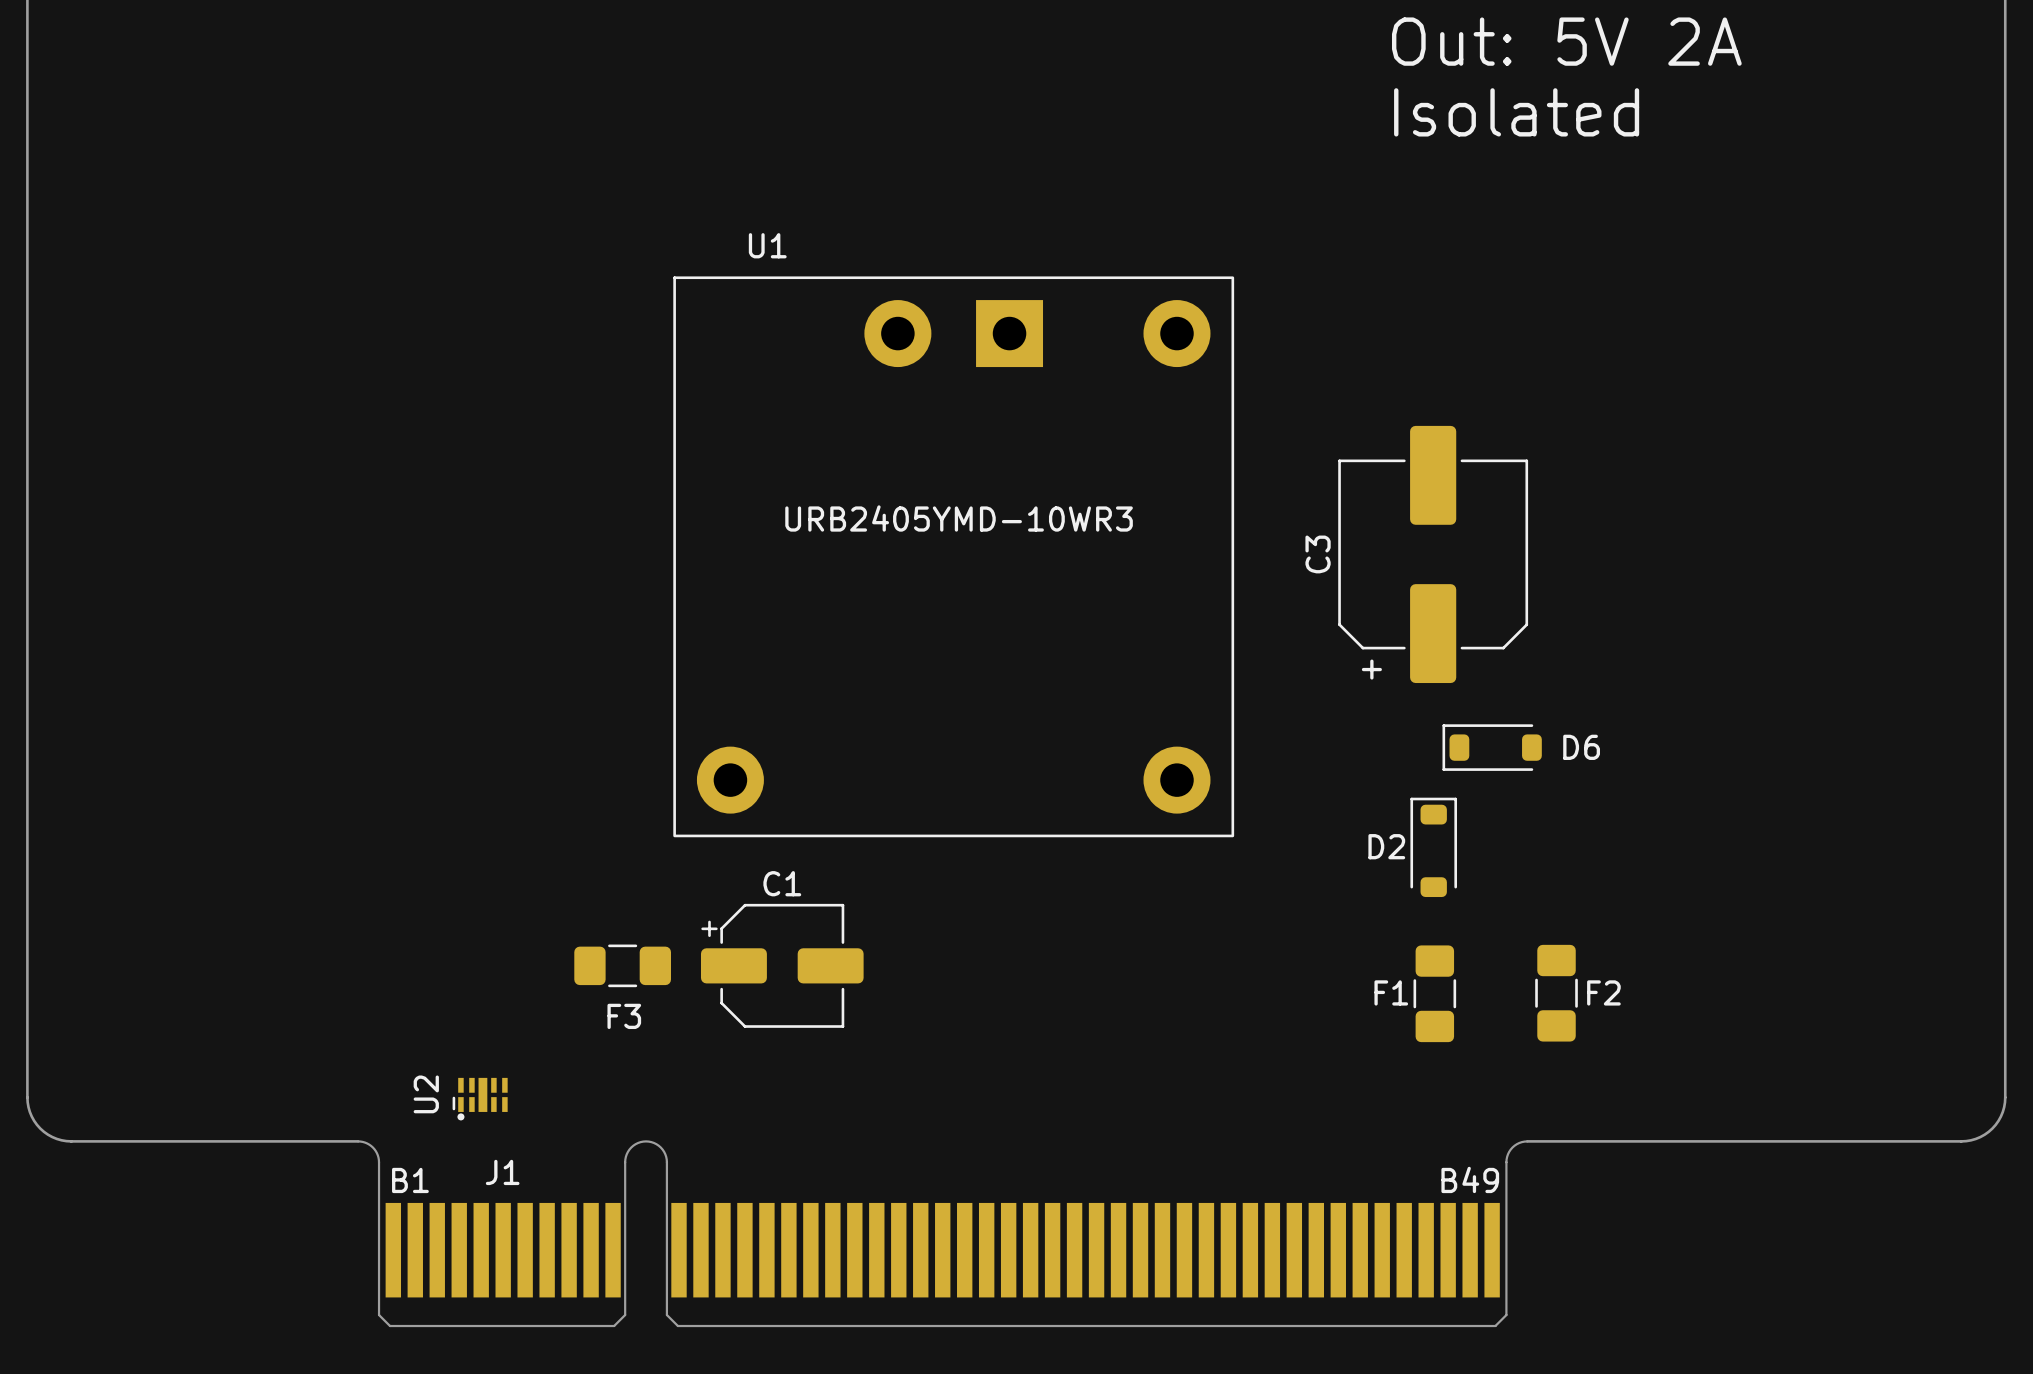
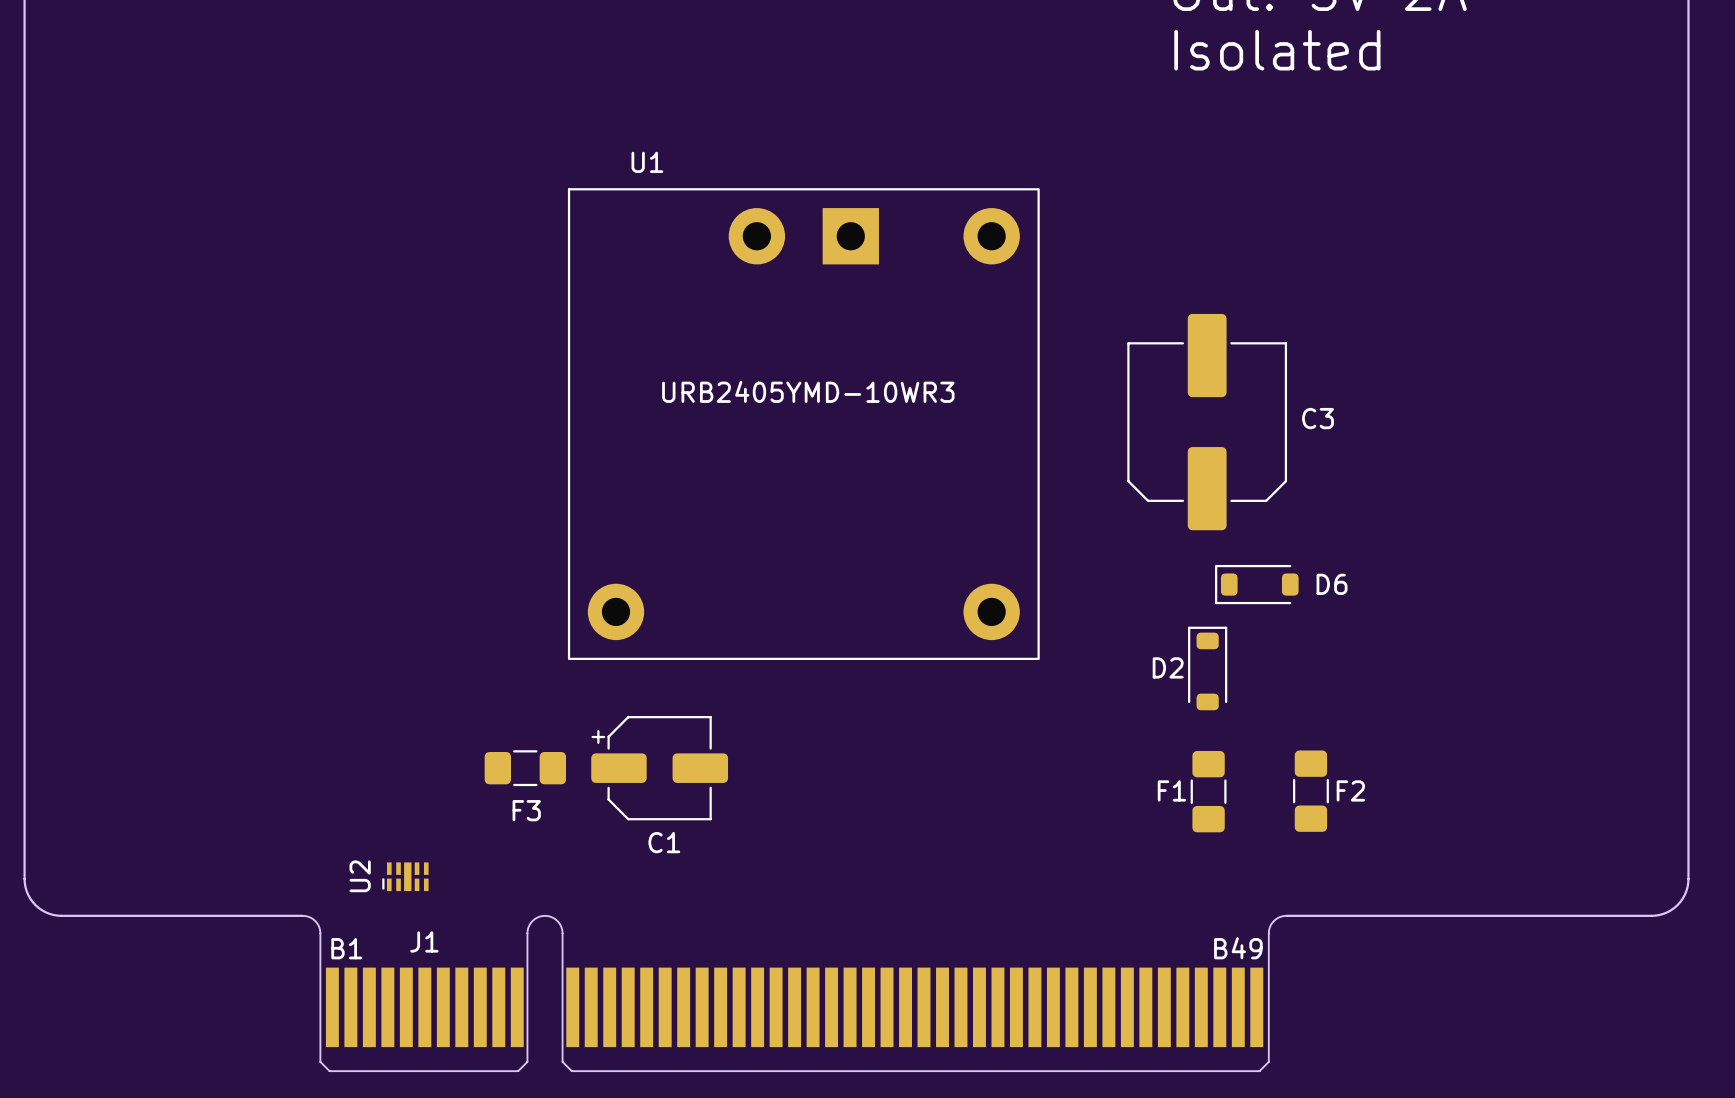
C3 name rotation: 0° (1318, 554) -> 90° clockwise (1317, 418)
C3 name position: C3 (1318, 554) -> C3 (1317, 418)
text: + (1371, 669) -> none
C1 name position: C1 (782, 883) -> C1 (664, 842)
U2 footprint: [452, 1077, 508, 1121] -> [382, 862, 429, 892]

